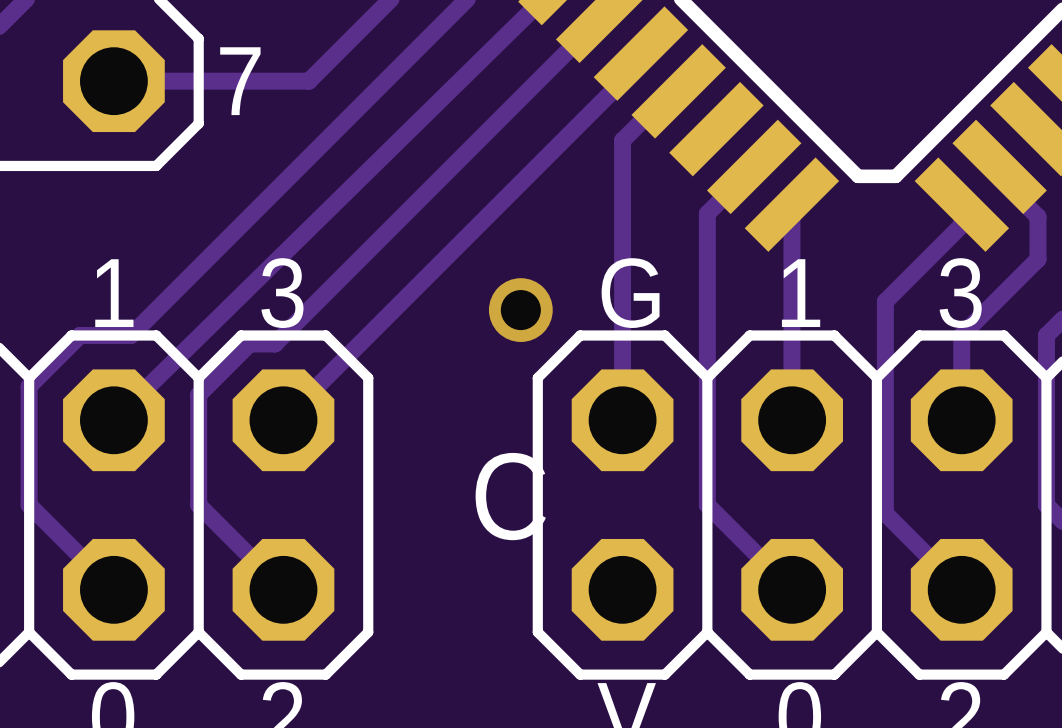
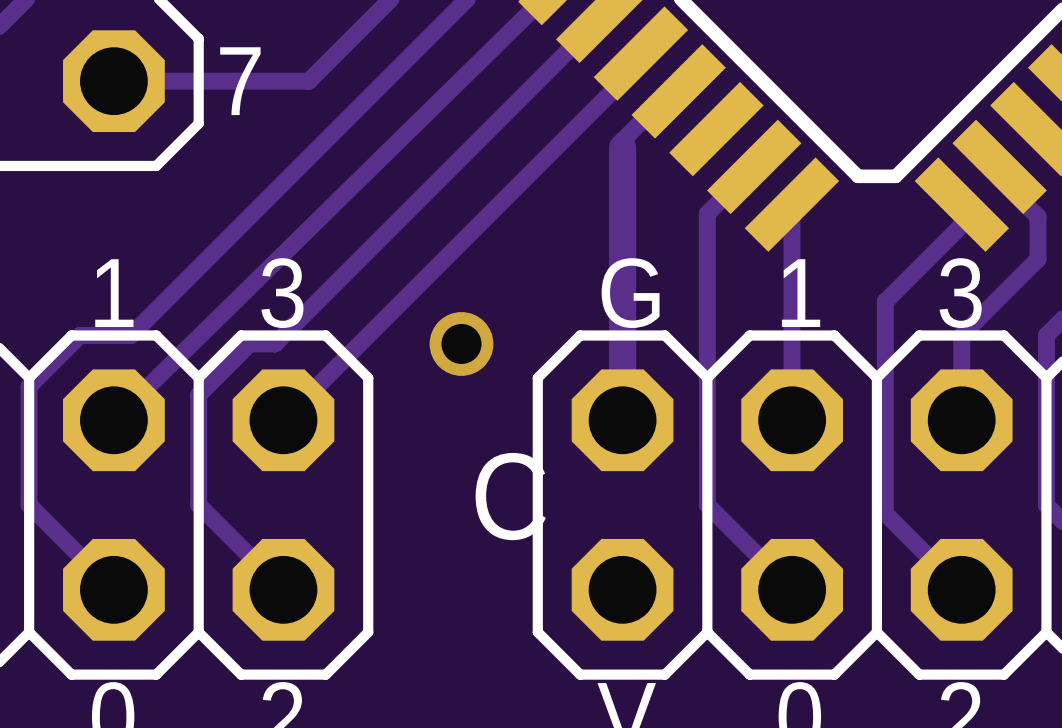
track width: thin (622, 147) (622, 420) -> thick (622, 147) (622, 420)
via position: (520, 310) -> (461, 343)

